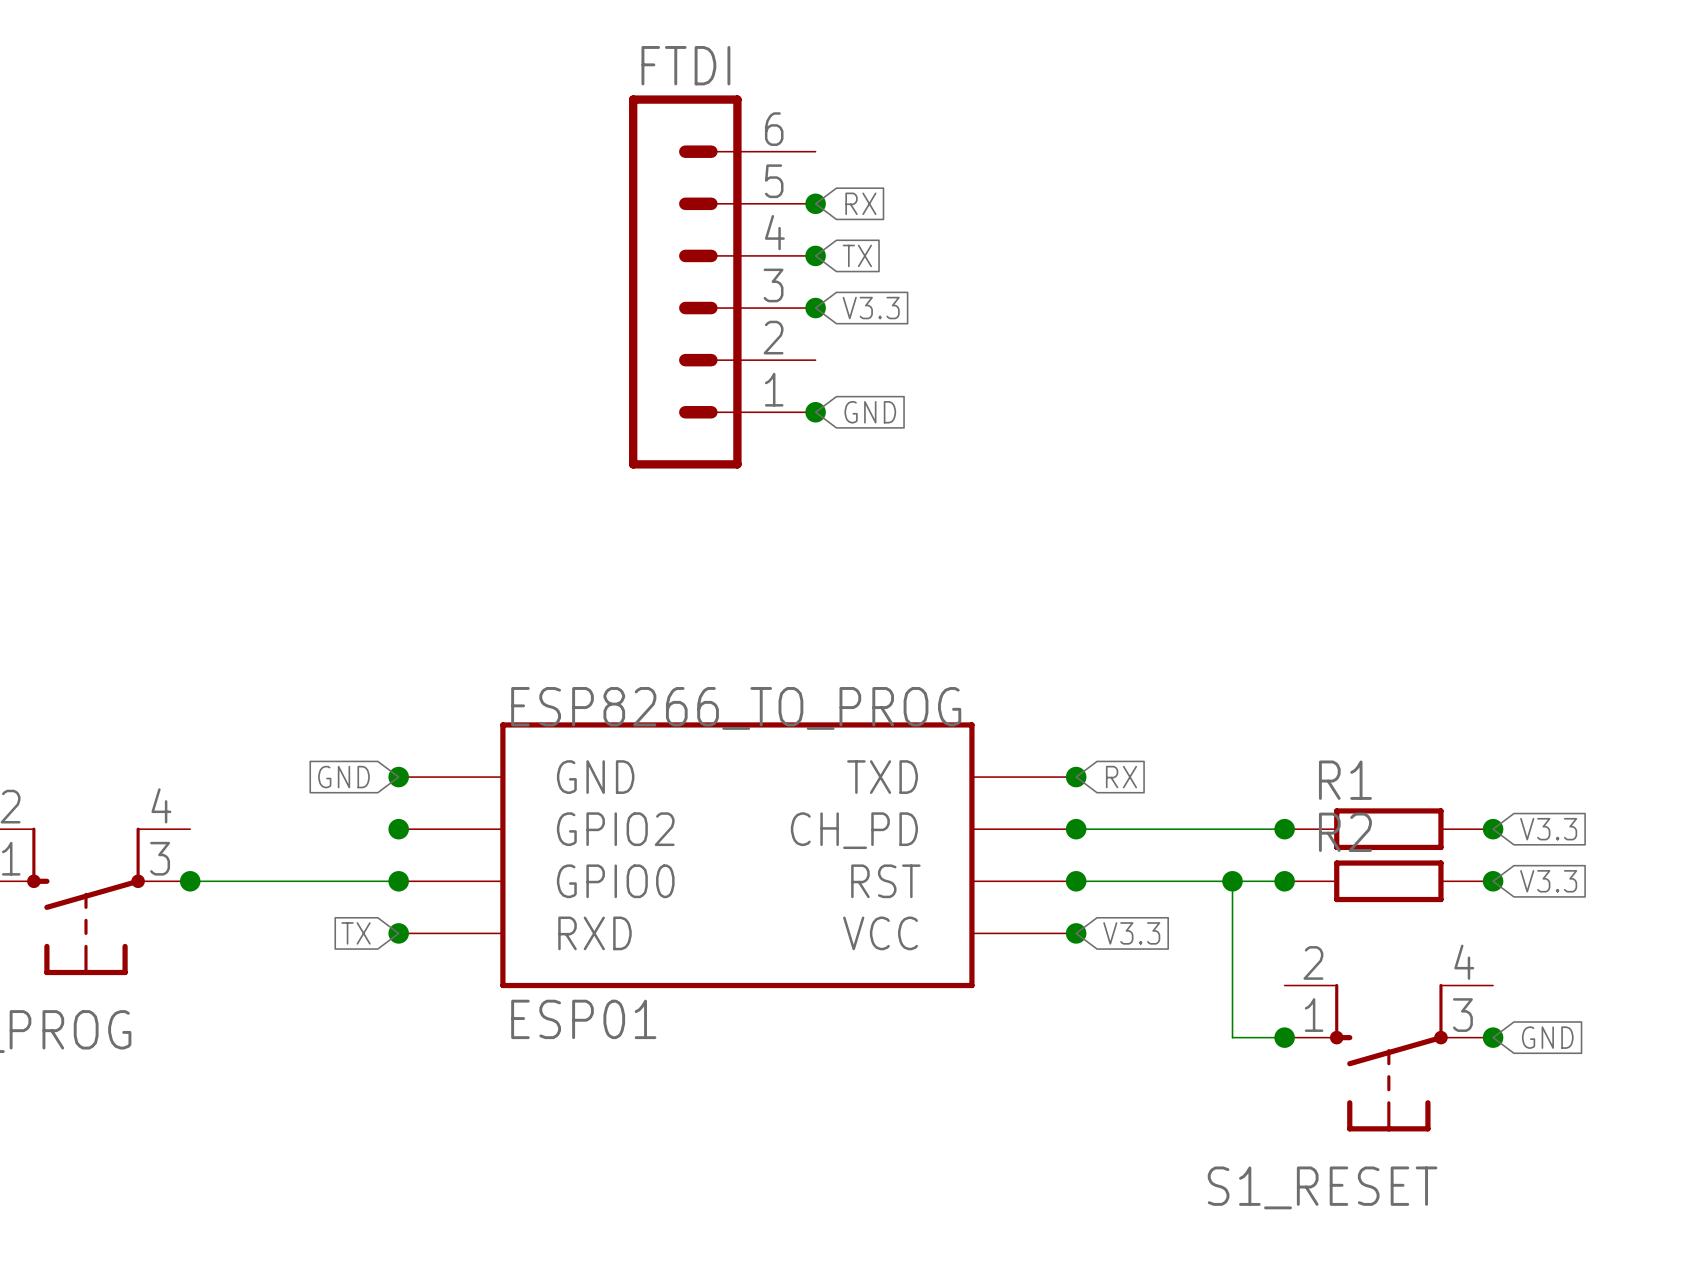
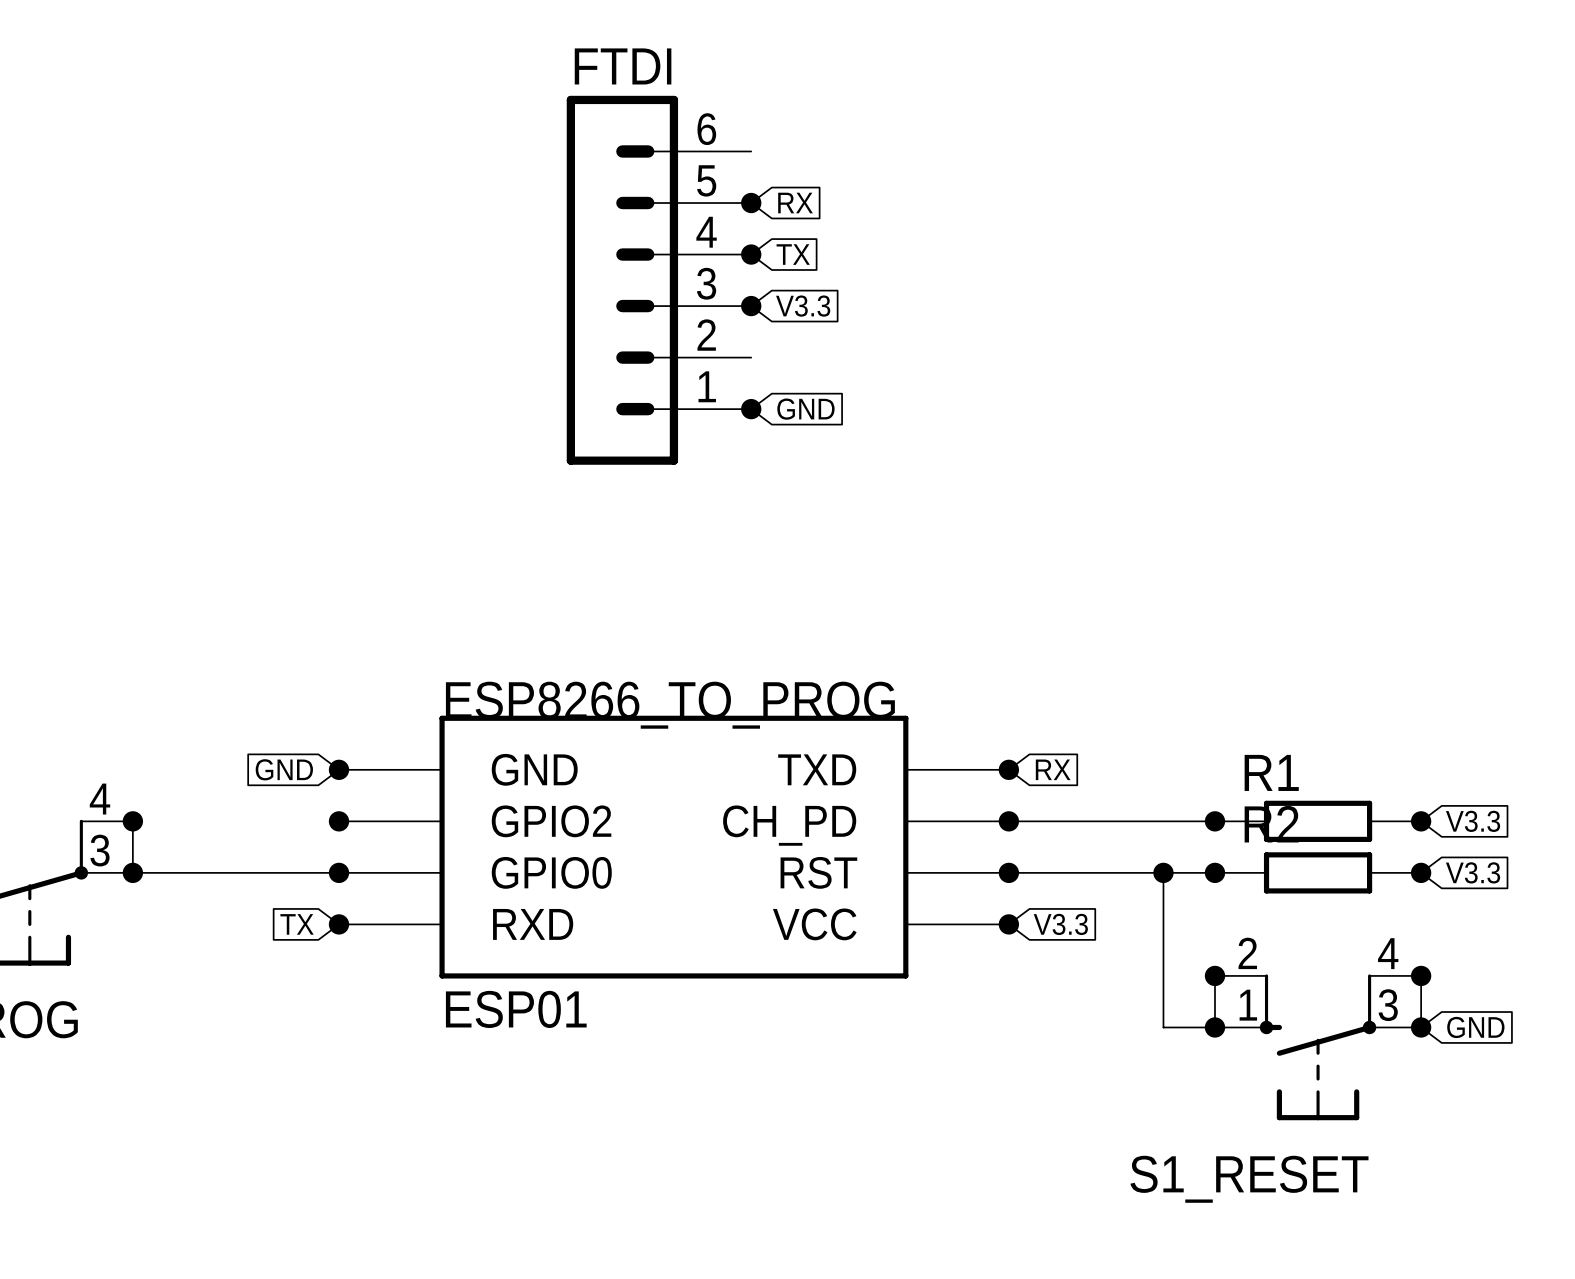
wire: none -> (132, 821) (132, 872)
junction: none -> (132, 821)
wire: none -> (1214, 975) (1214, 1027)
junction: none -> (1214, 975)
wire: none -> (1421, 975) (1421, 1027)
junction: none -> (1421, 975)

